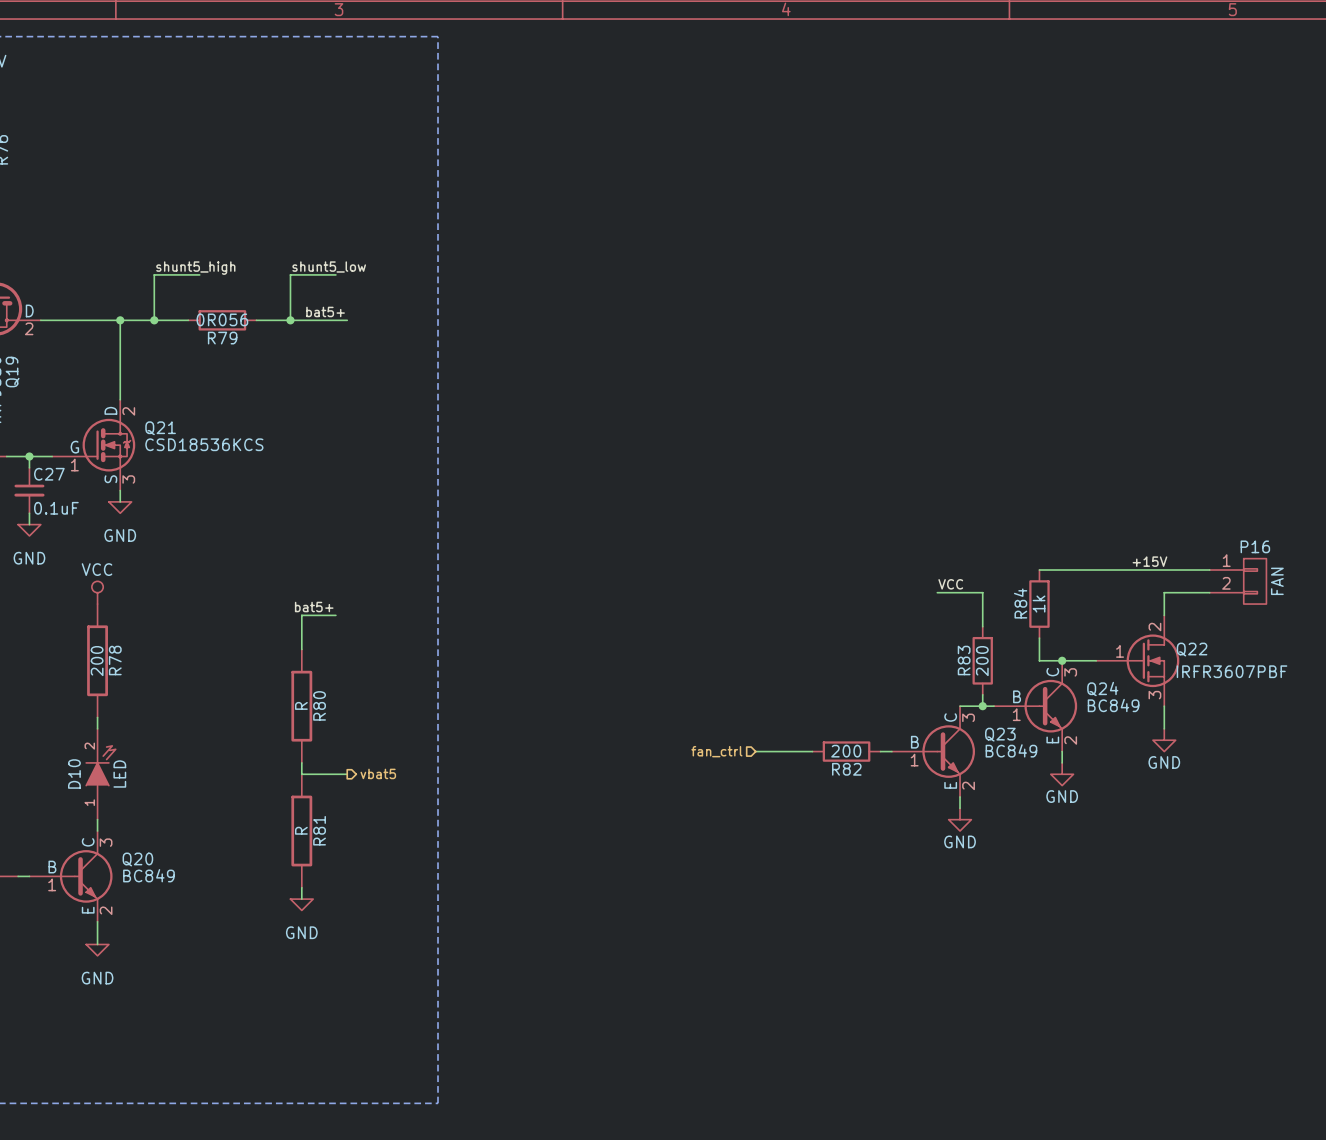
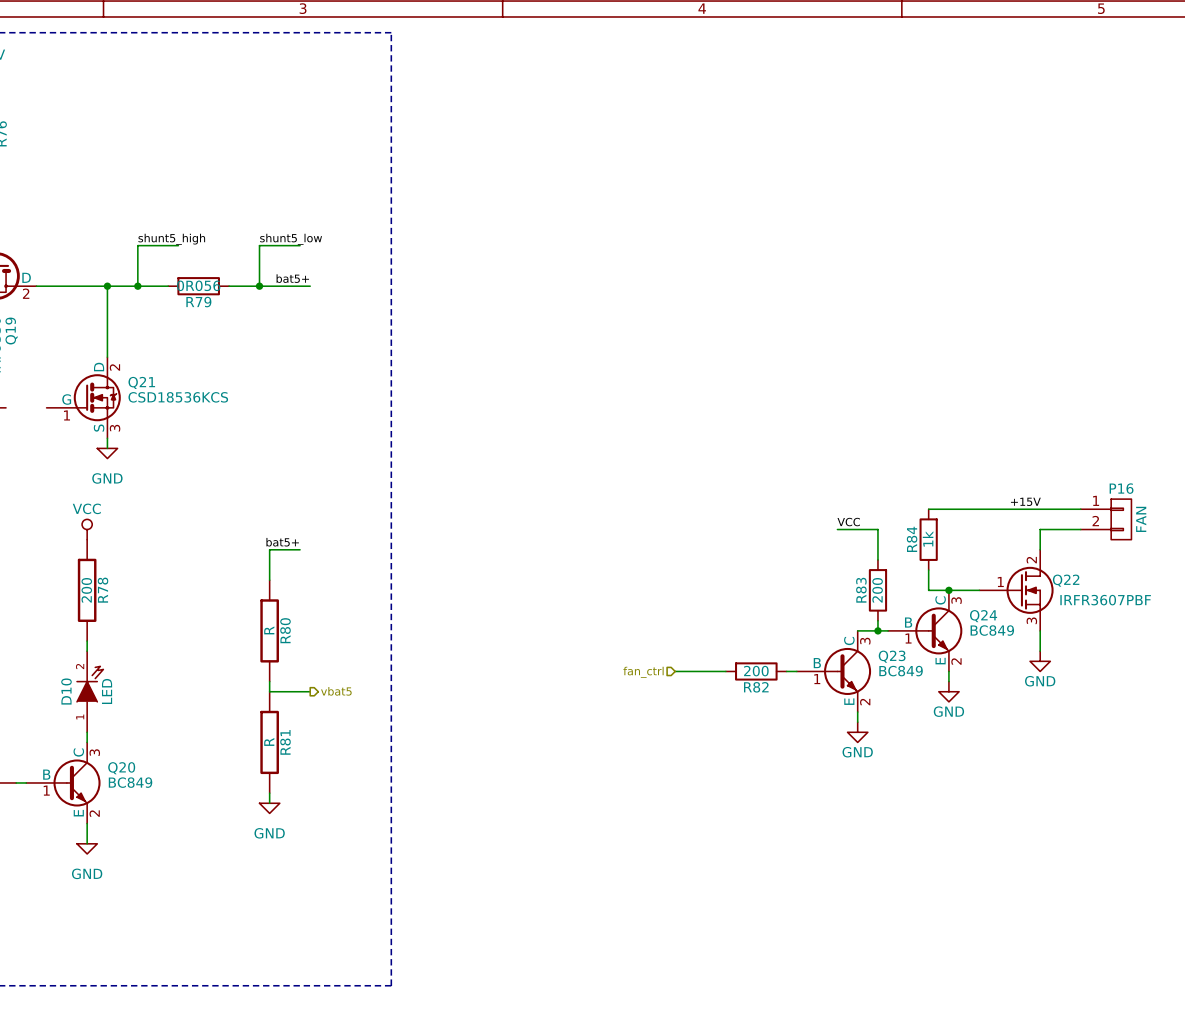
wire: (6, 456) (52, 456) -> none
wire: (29, 456) (29, 467) -> none
junction: (29, 456) -> none
C27: 0.1uF (29, 490) -> none
wire: (29, 513) (29, 524) -> none
power symbol: GND (29, 530) -> none

